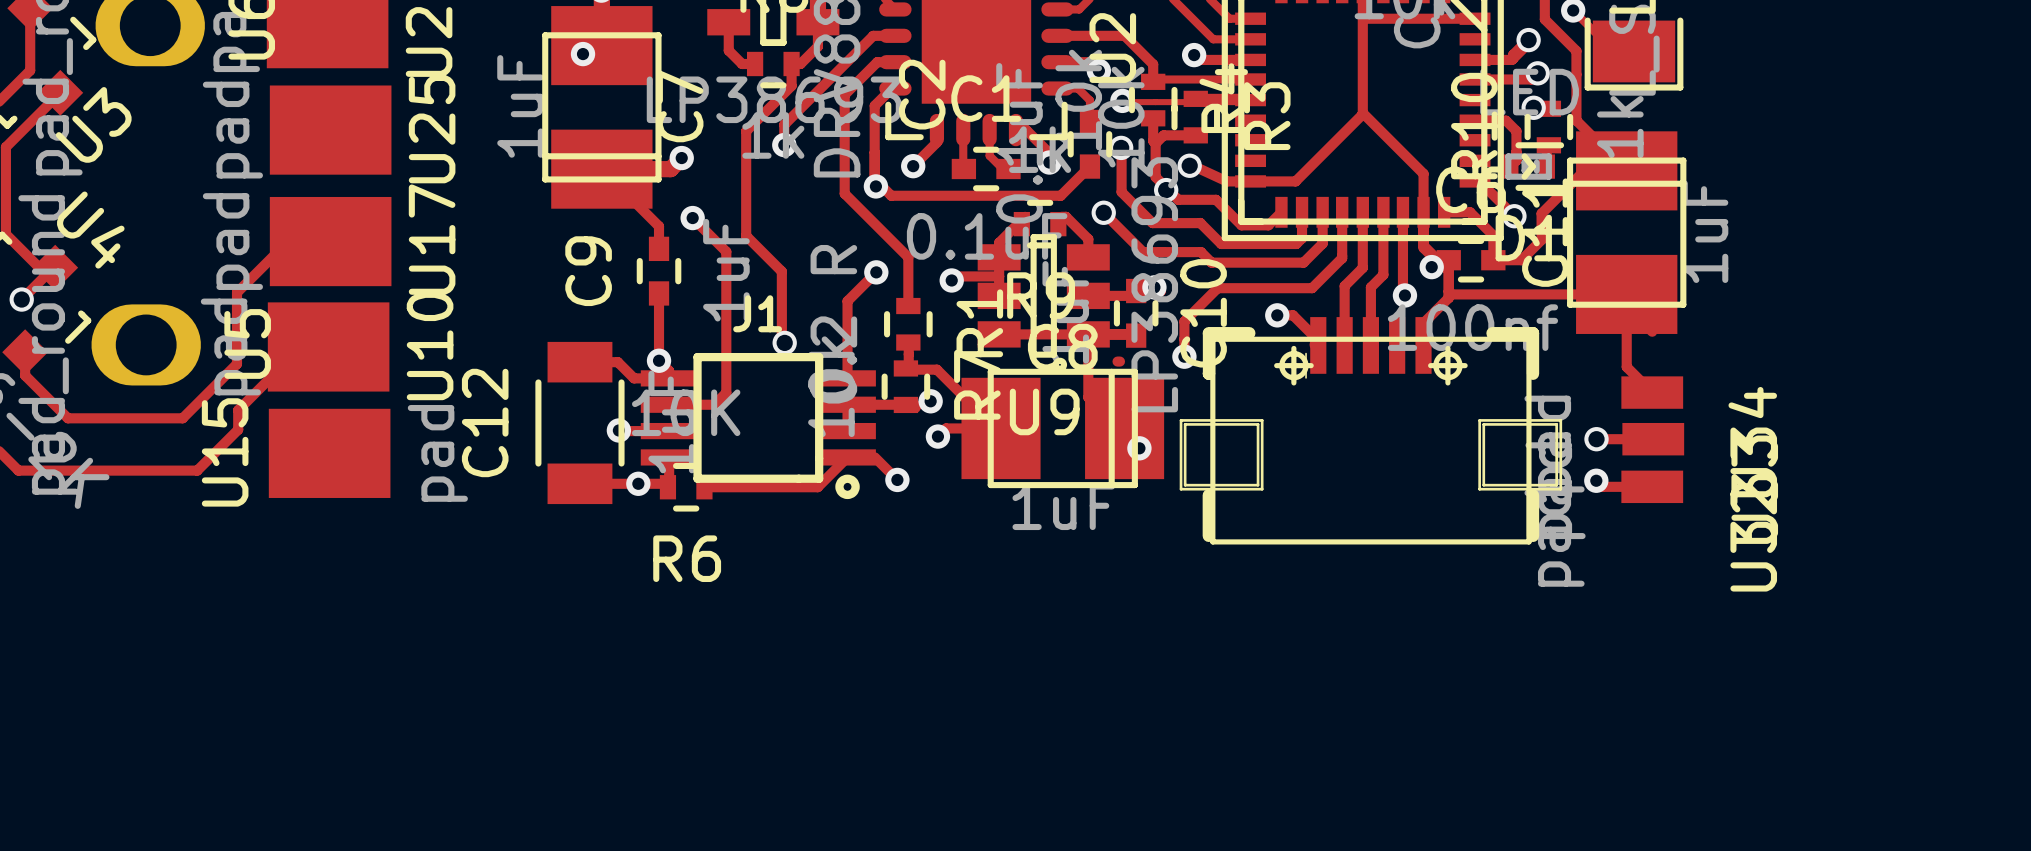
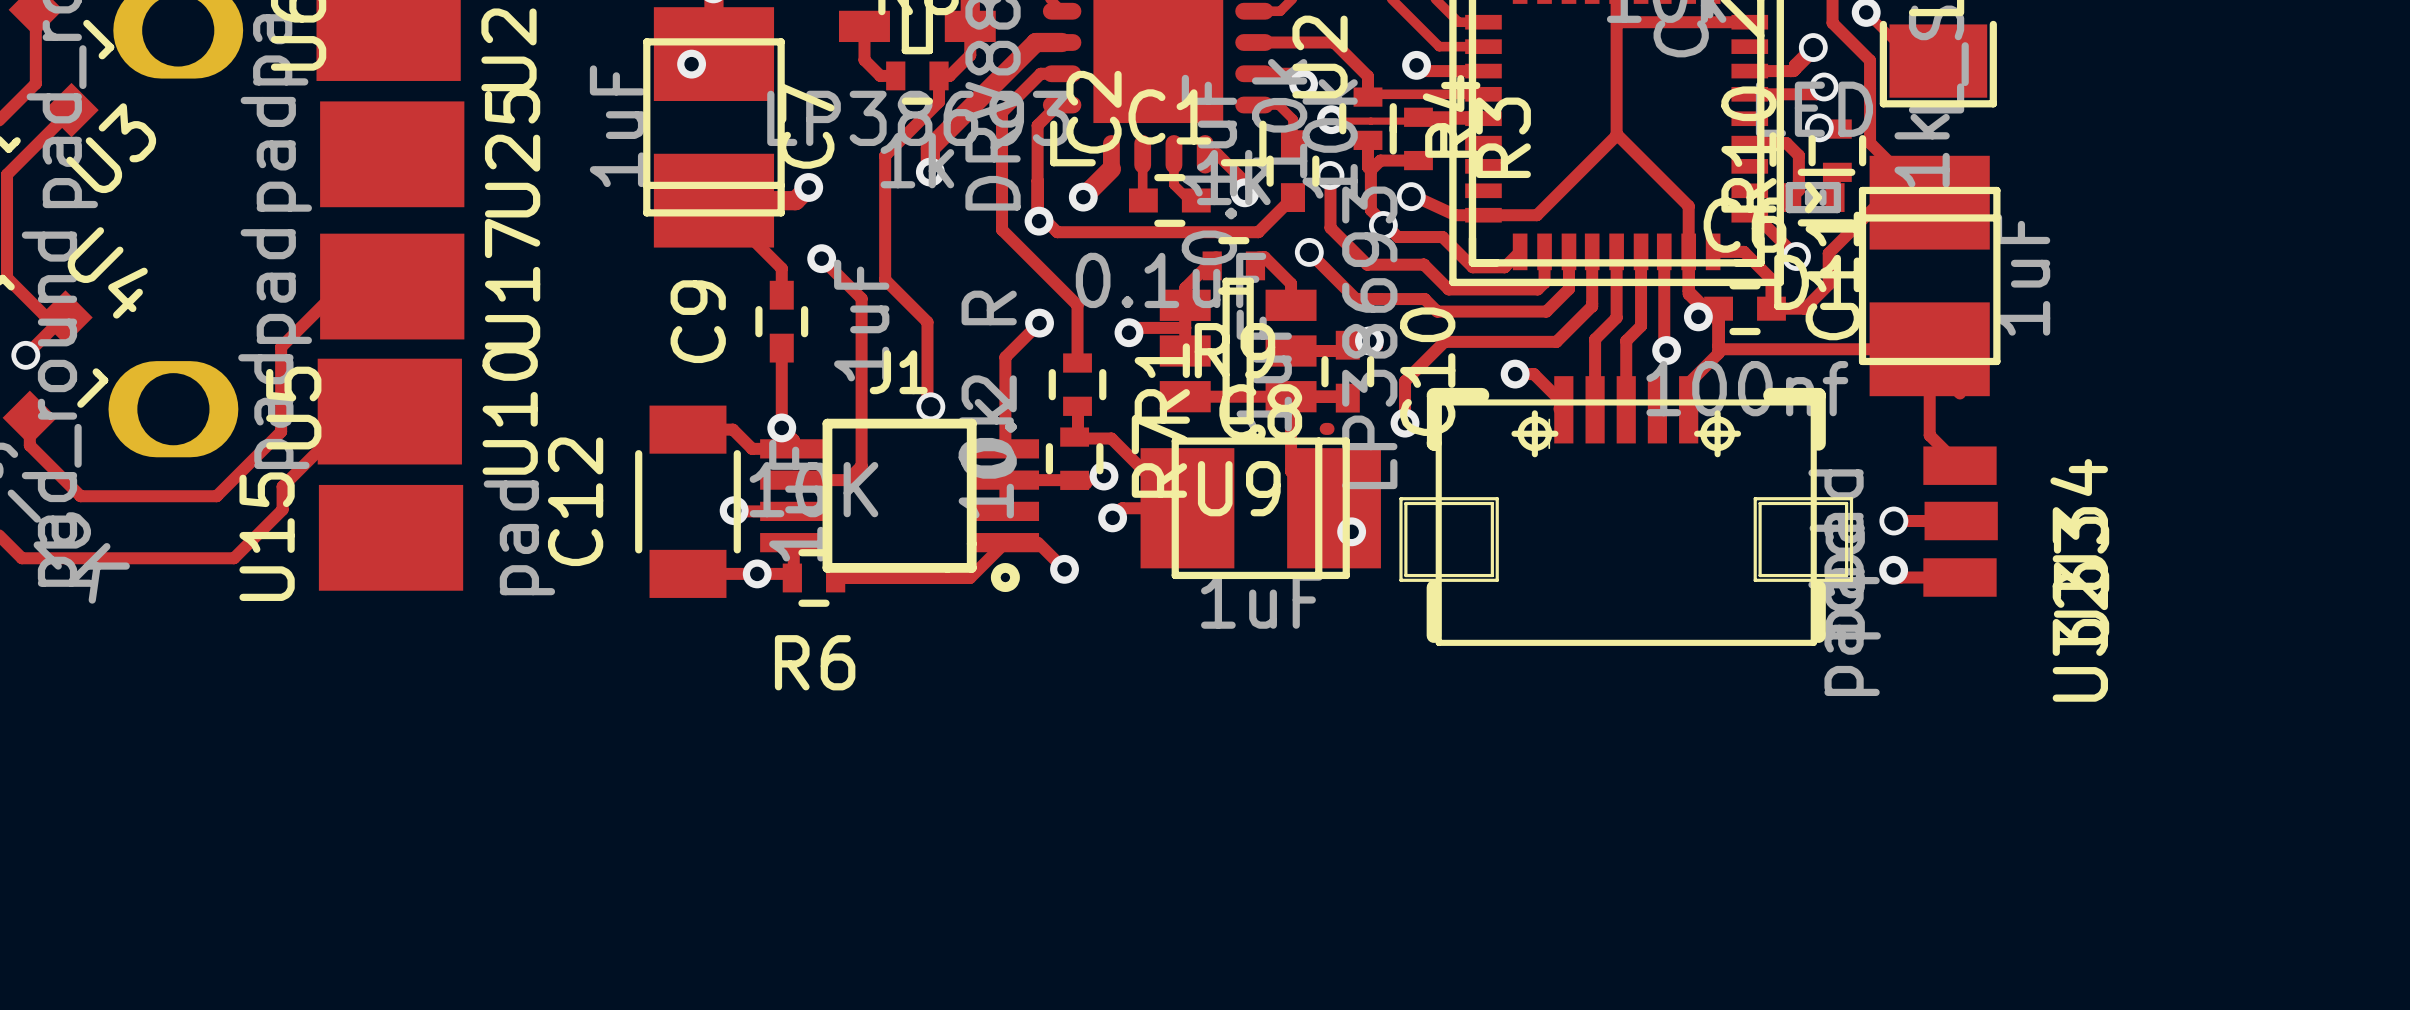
track width: thin (895, 35) (873, 35) (784, 124) (784, 145) -> thick (1062, 42) (1035, 42) (930, 148) (930, 172)
track width: thin (936, 142) (913, 166) -> thick (1111, 168) (1083, 197)

